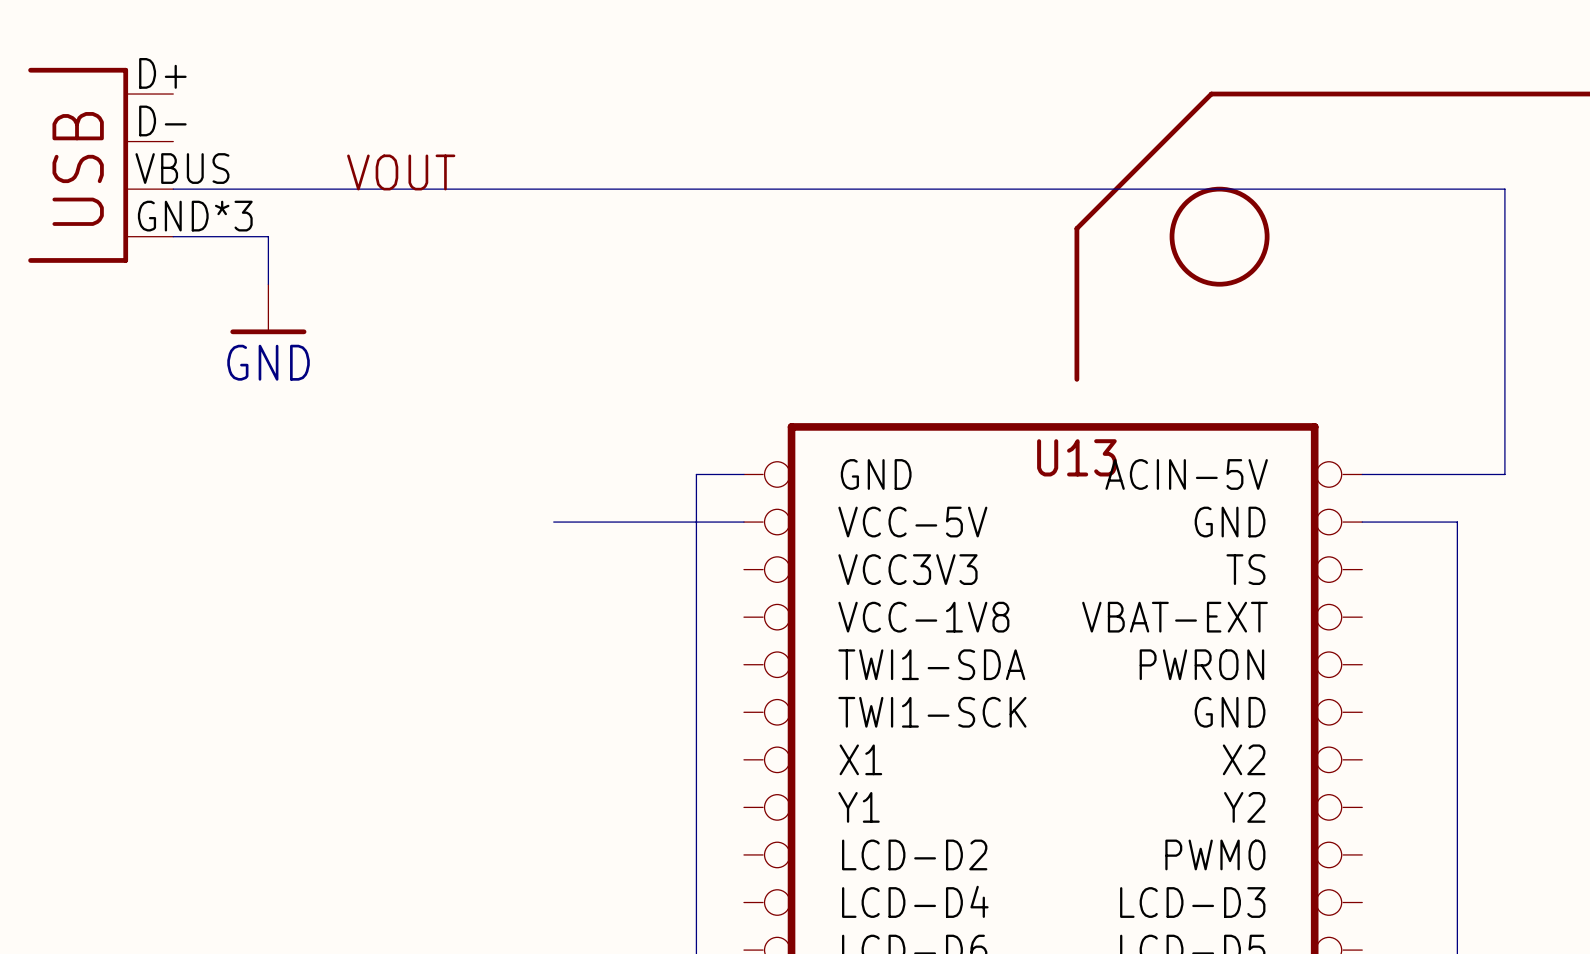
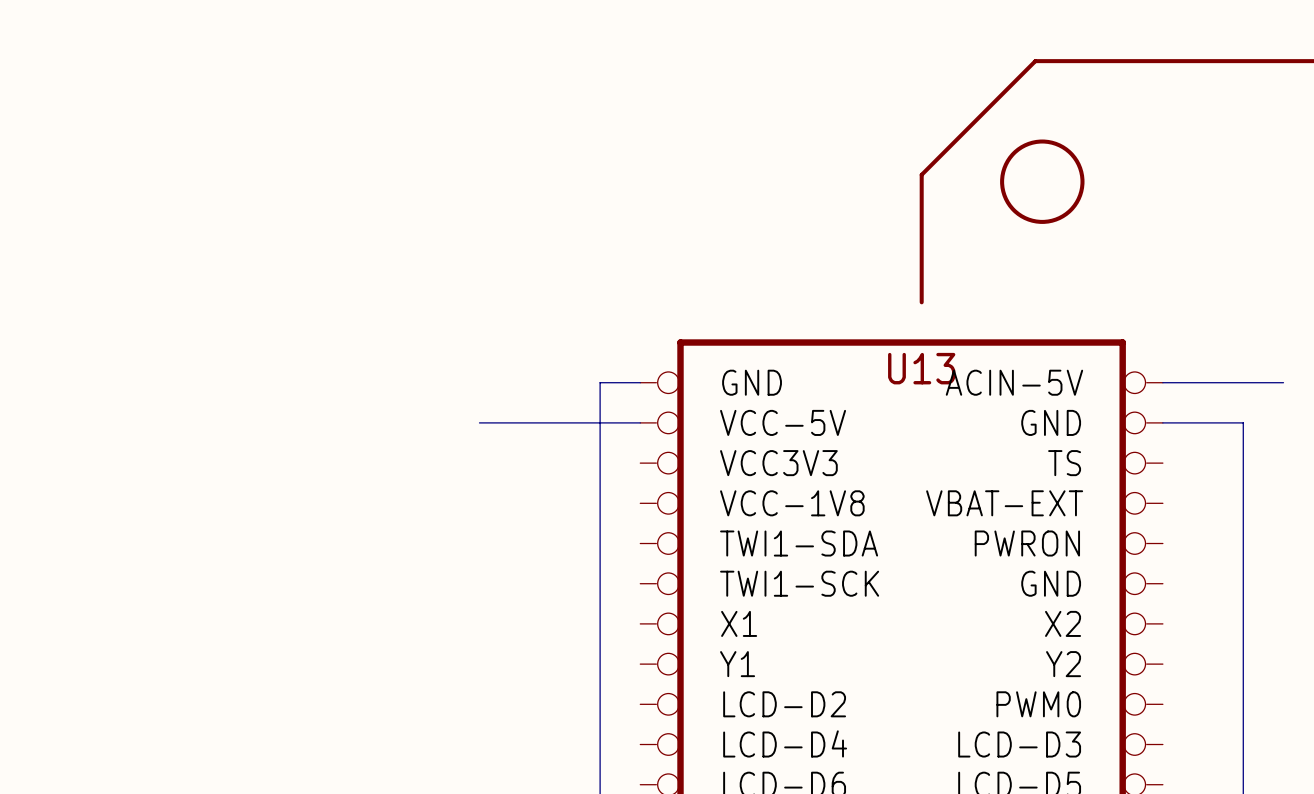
part: (100, 165) -> none
label: VOUT (401, 172) -> none
wire: (173, 189) (1504, 189) (1504, 474) -> none
wire: (173, 236) (268, 236) (268, 284) -> none
power symbol: GND (268, 309) -> none

